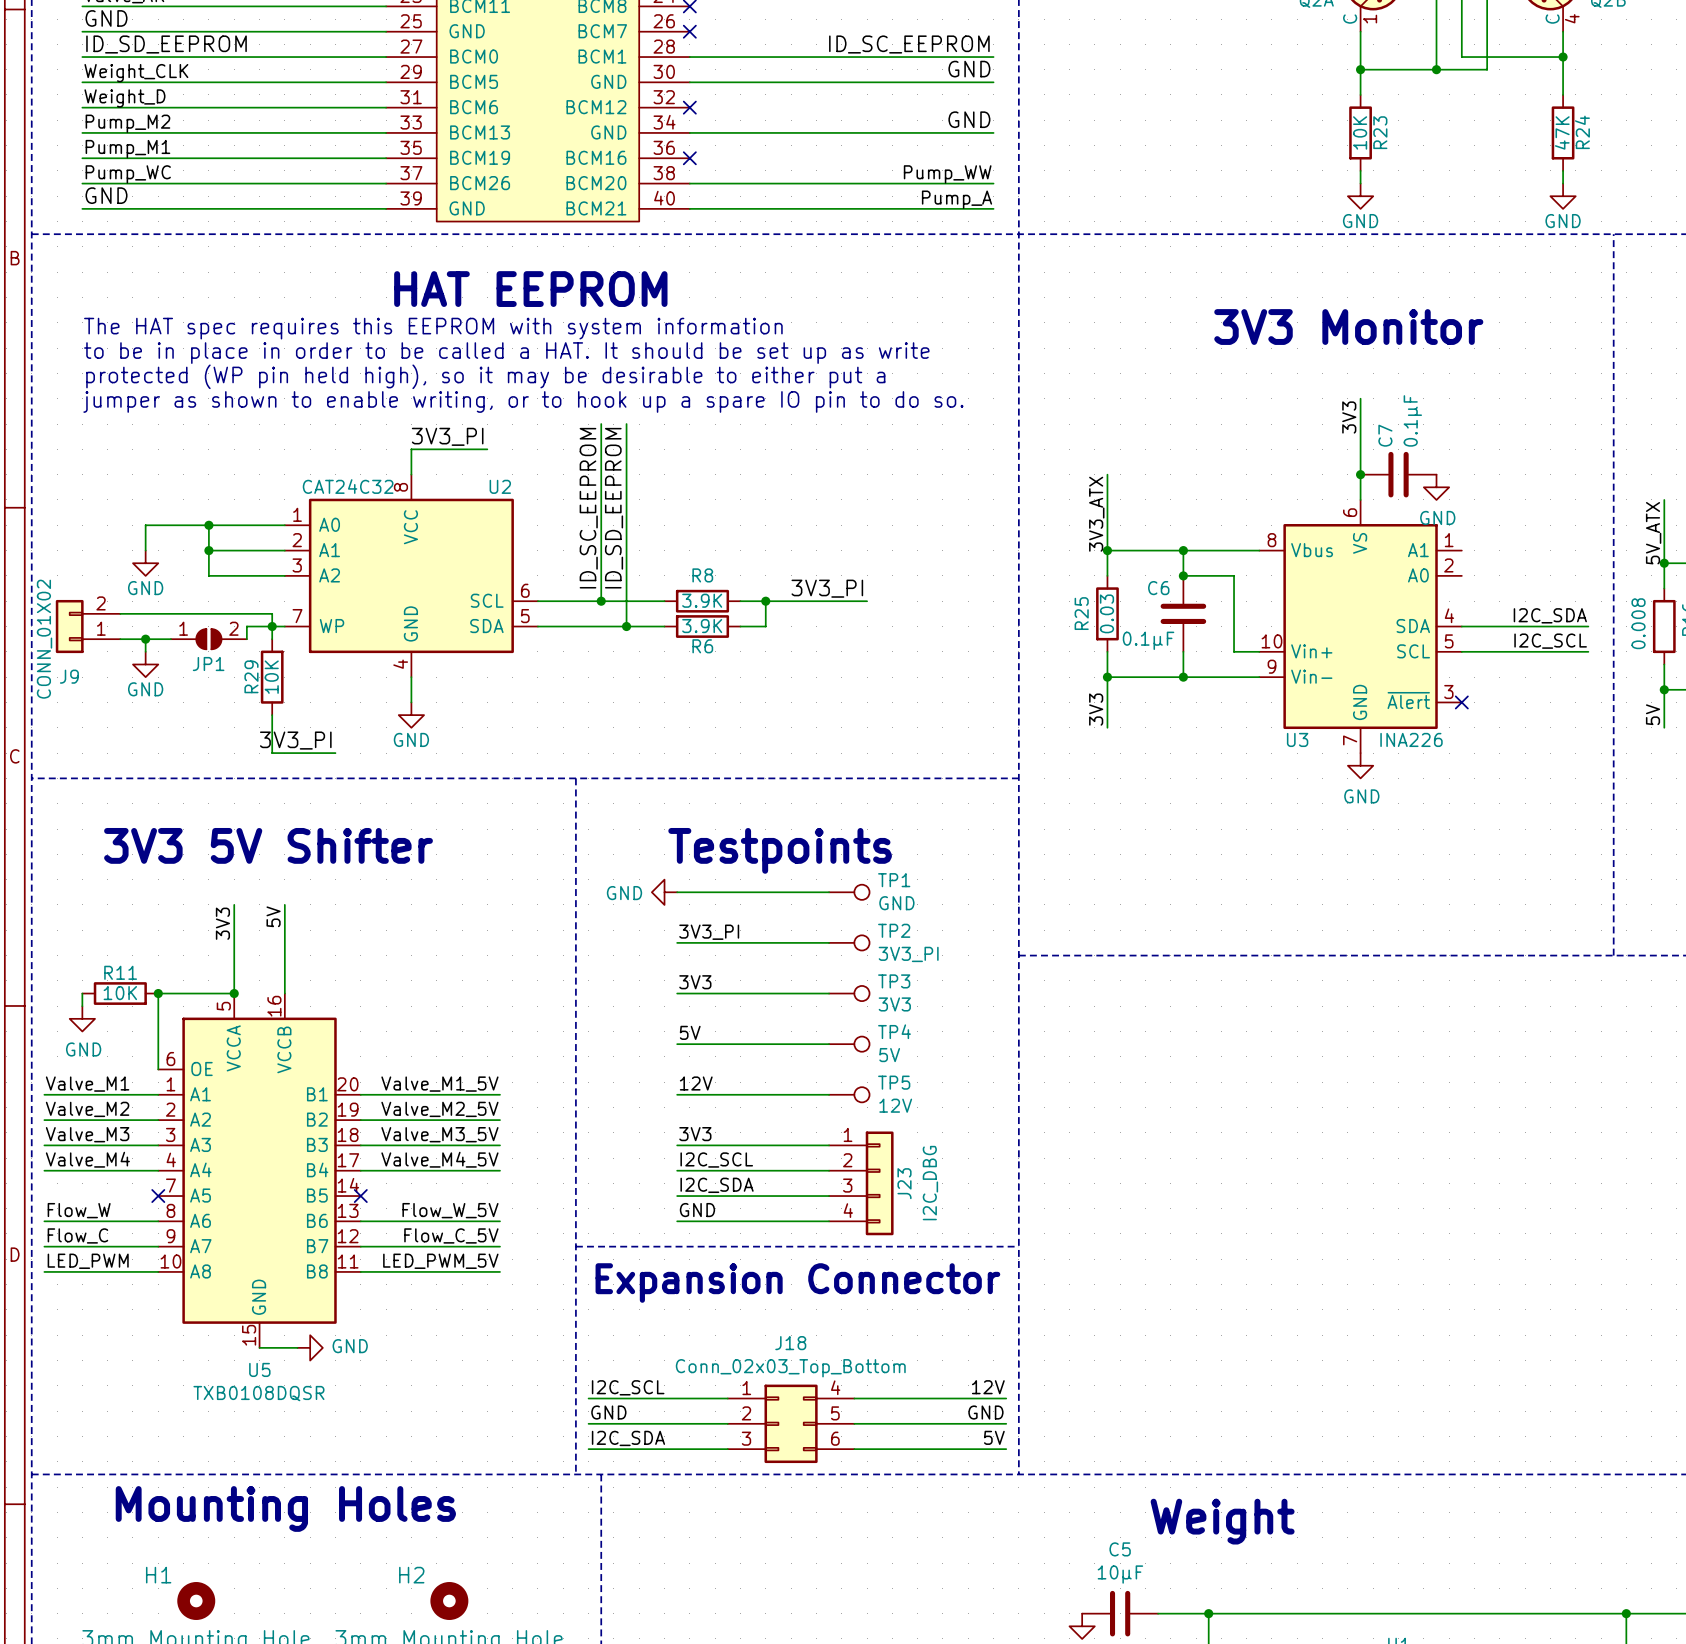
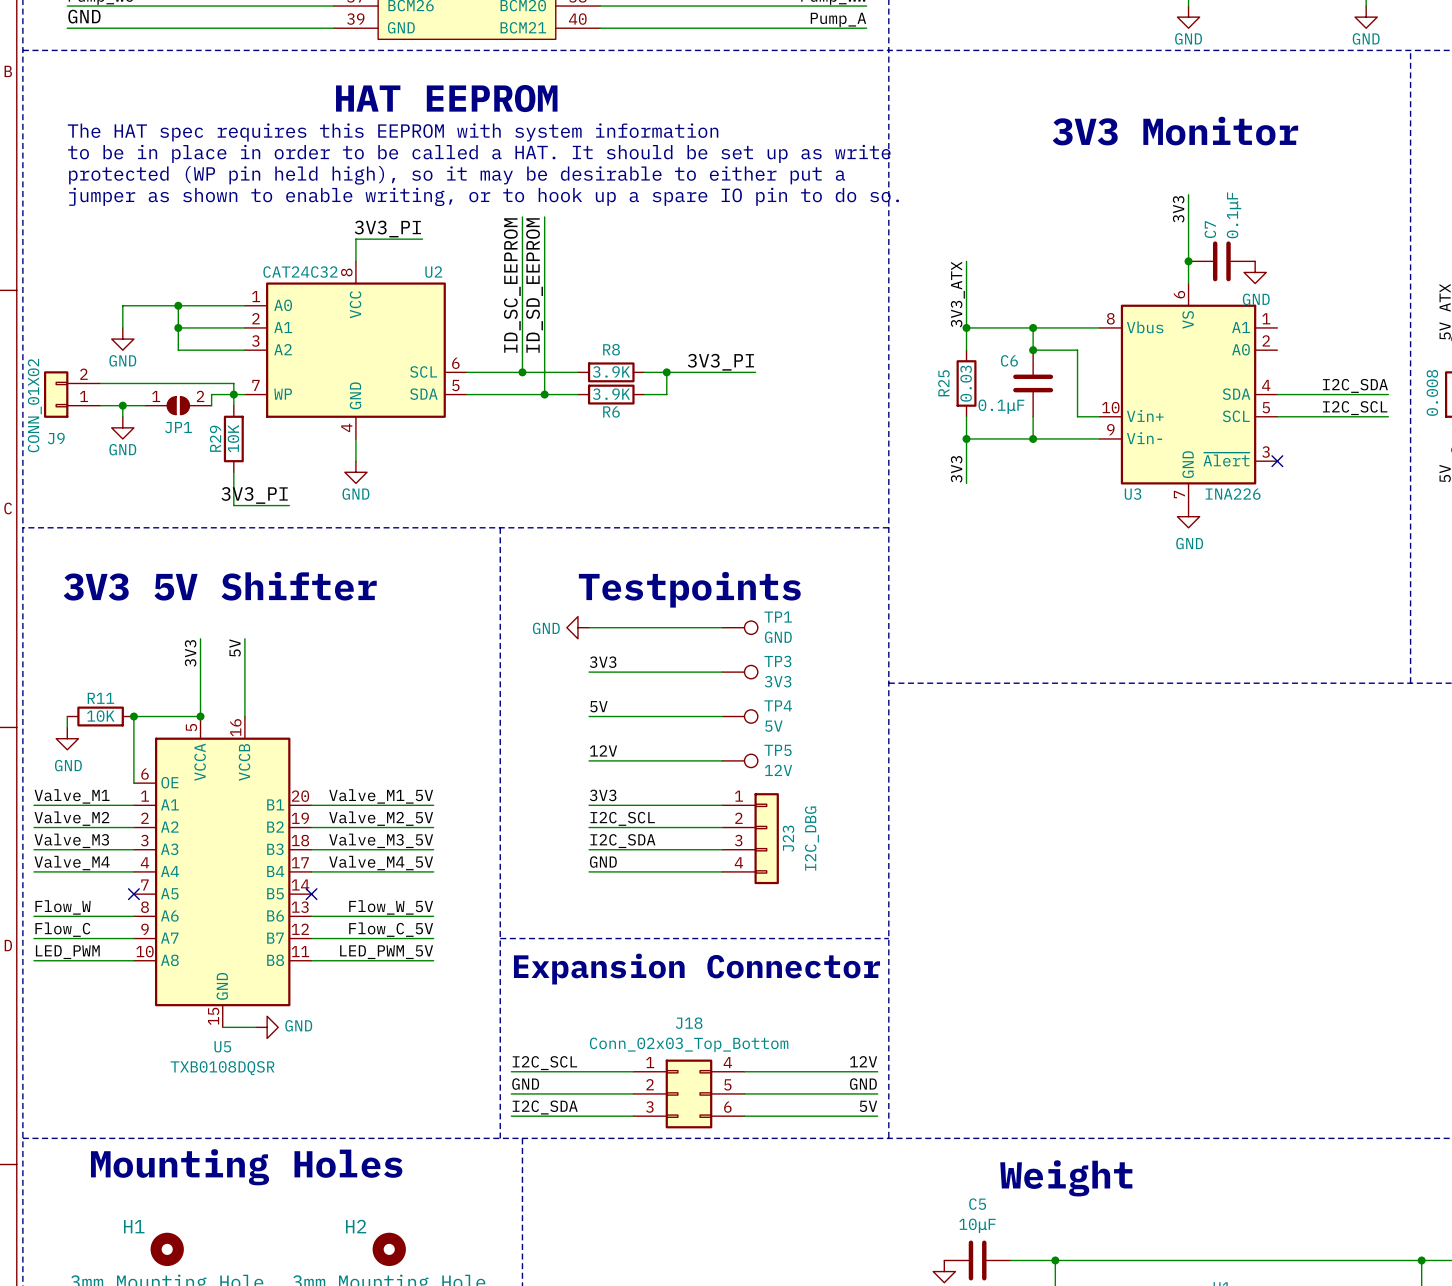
TP2 name: TP2 (894, 930) -> TP3 (777, 661)
label: 3V3_PI (709, 932) -> 3V3 (603, 662)
TP2 value: 3V3_PI (908, 954) -> 3V3 (778, 681)
TP3 name: TP3 (894, 981) -> TP4 (778, 705)
label: 3V3 (695, 982) -> 5V (598, 706)
TP3 value: 3V3 (894, 1004) -> 5V (773, 726)
TP4 name: TP4 (894, 1031) -> TP5 (778, 750)
label: 5V (690, 1032) -> 12V (603, 750)
TP4 value: 5V (889, 1055) -> 12V (778, 770)
label: 12V (696, 1083) -> 3V3 (603, 795)
TP5: 12V (849, 1094) -> none
label: none -> I2C_SCL (622, 818)
label: 3V3 (695, 1134) -> I2C_SDA (622, 841)
label: I2C_SCL (716, 1160) -> GND (603, 862)
J23 position: (861, 1183) -> (750, 838)
label: I2C_SDA (717, 1185) -> none
wire: (677, 1196) (829, 1196) -> (589, 827) (722, 827)
label: GND (697, 1210) -> none
wire: (677, 1221) (829, 1221) -> none

